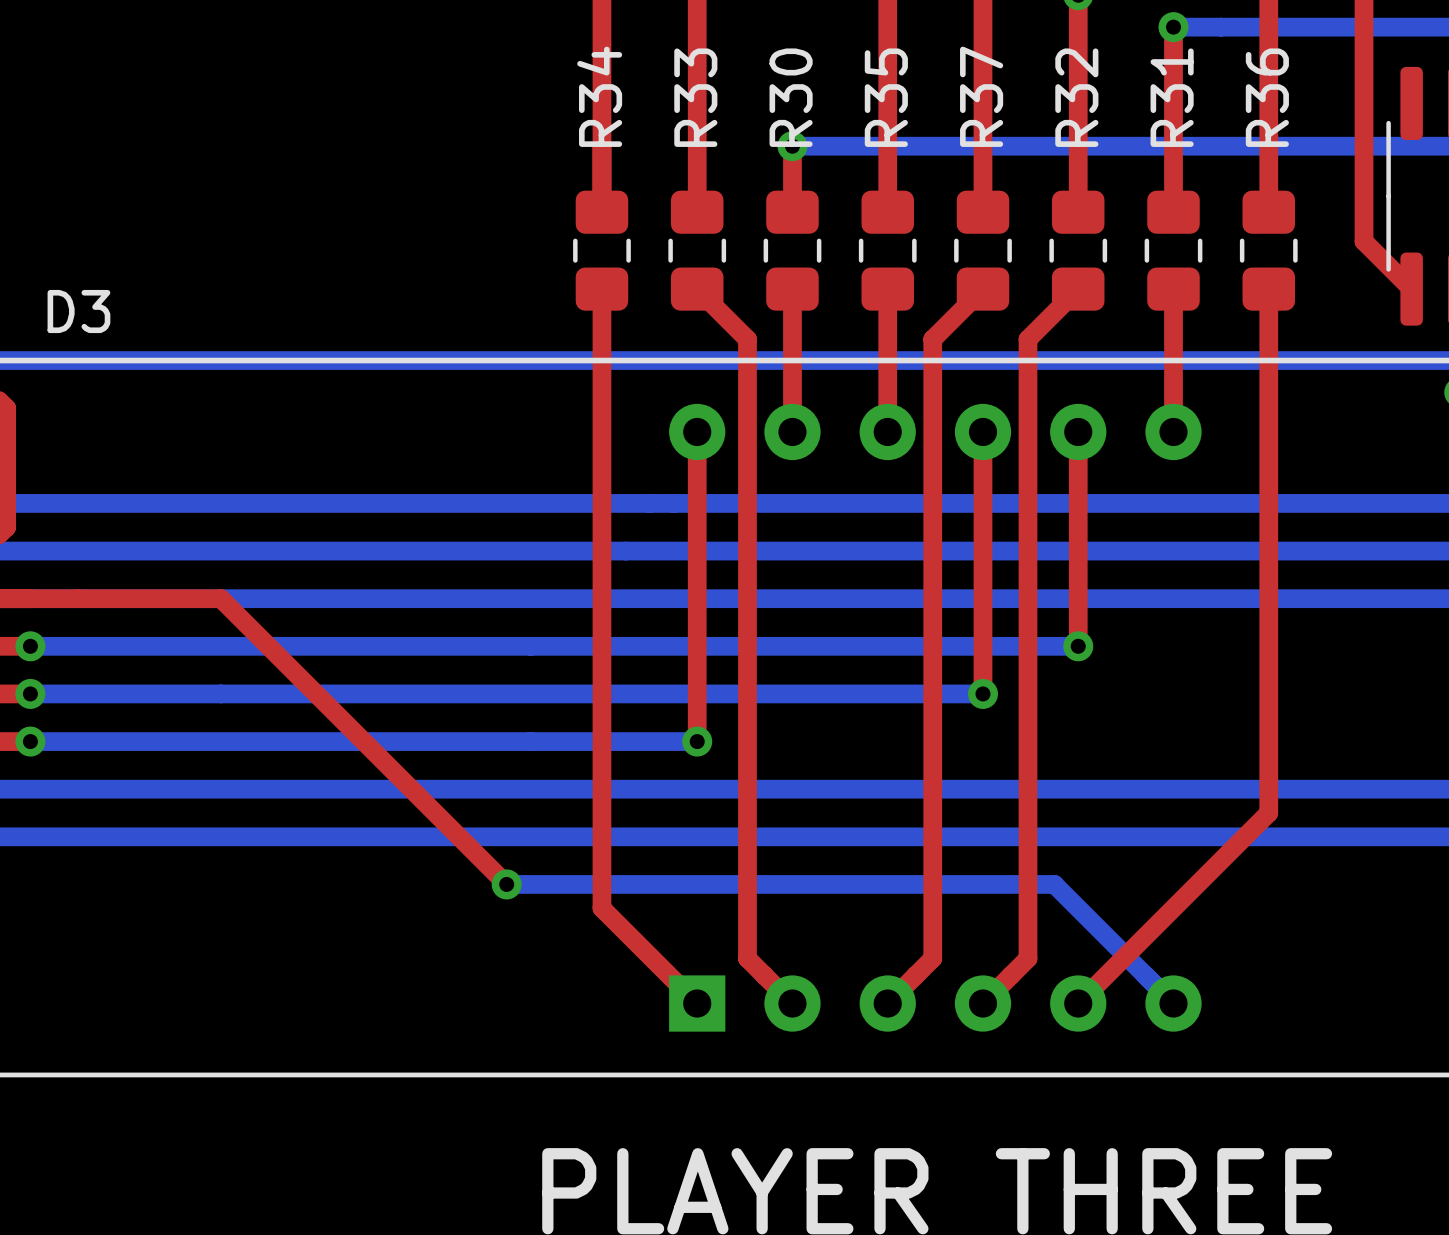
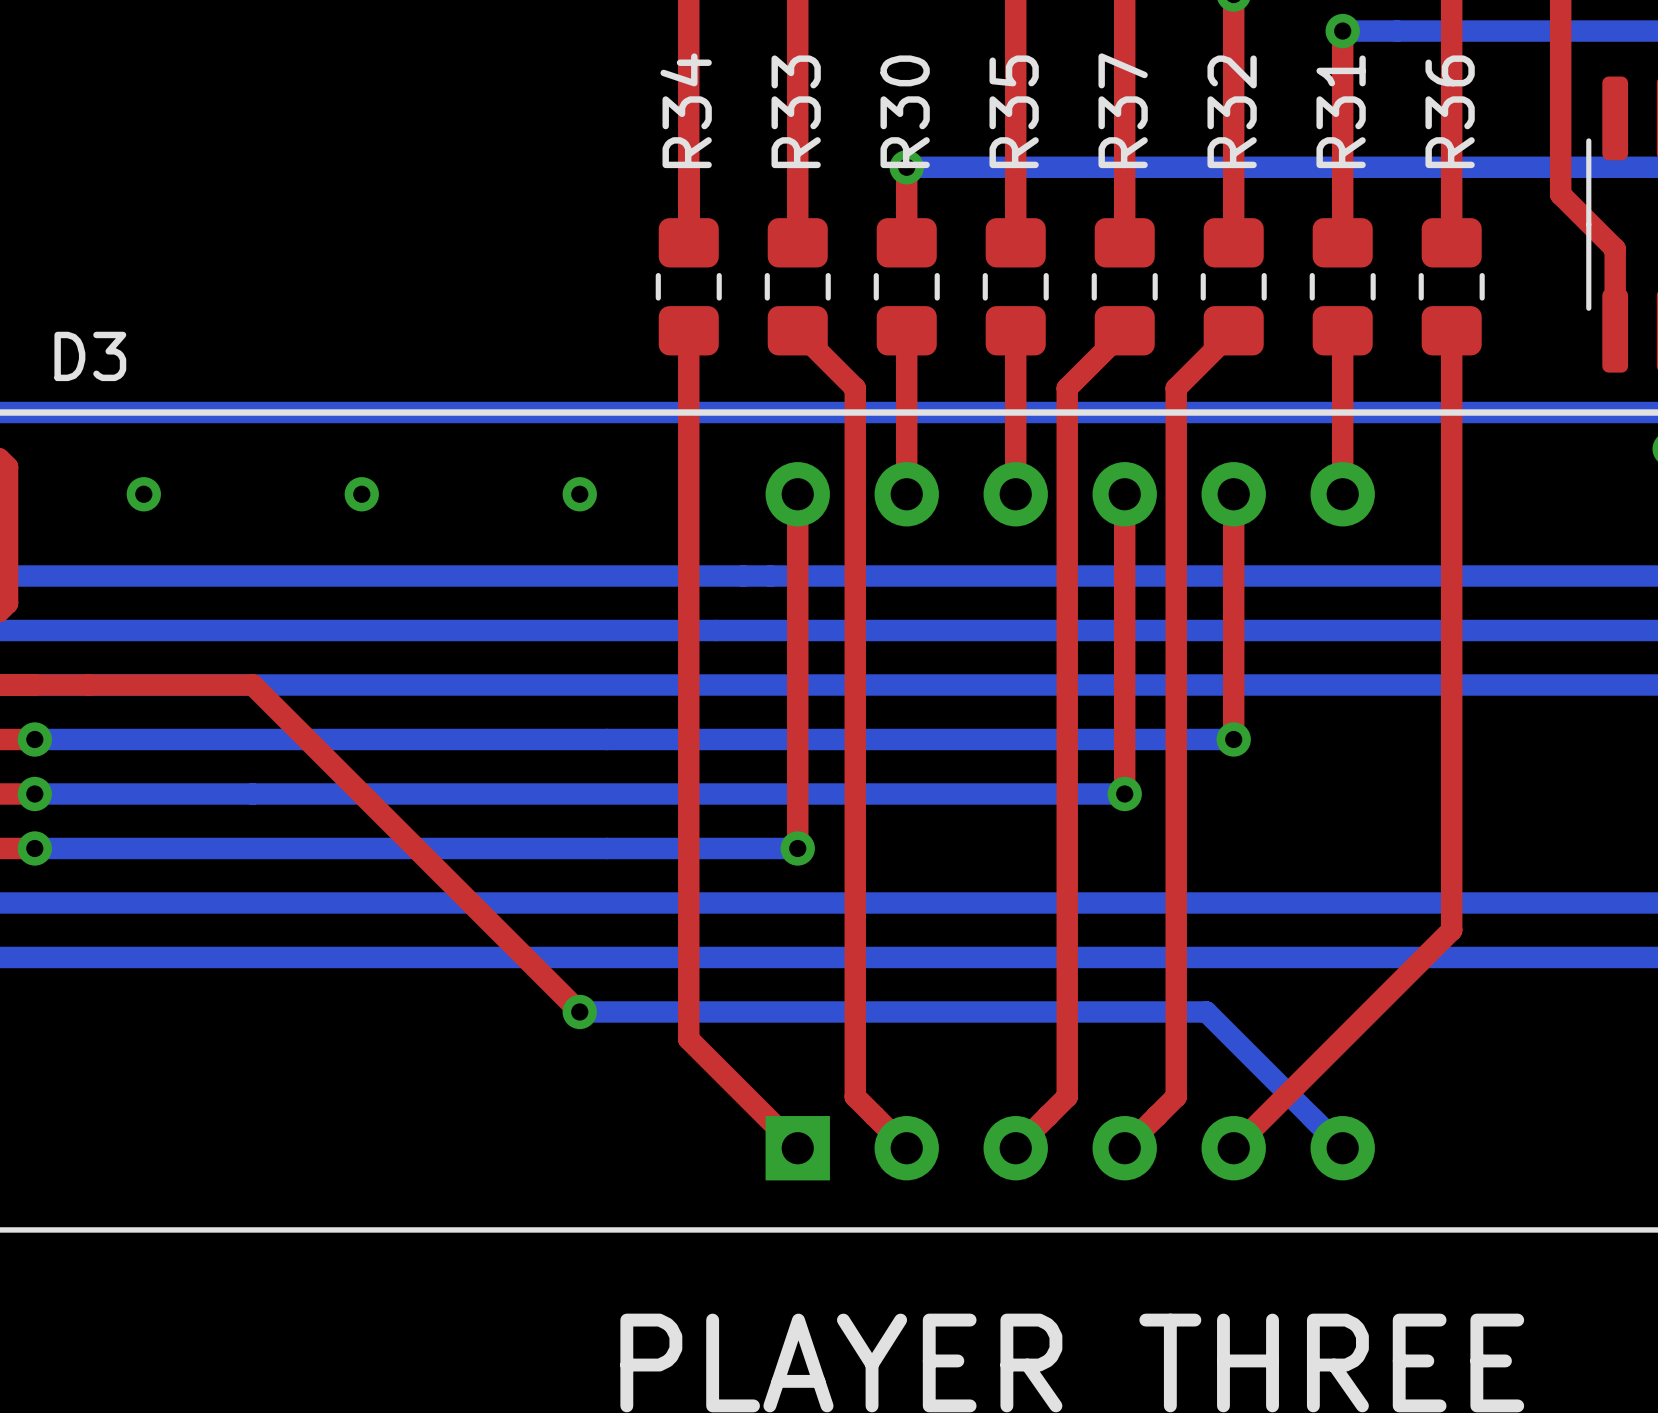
top track: (1364, 170) (1364, 241) (1411, 289) -> (1560, 194) (1615, 249) (1615, 330)
via: none -> (143, 494)
via: none -> (361, 494)
via: none -> (579, 494)

